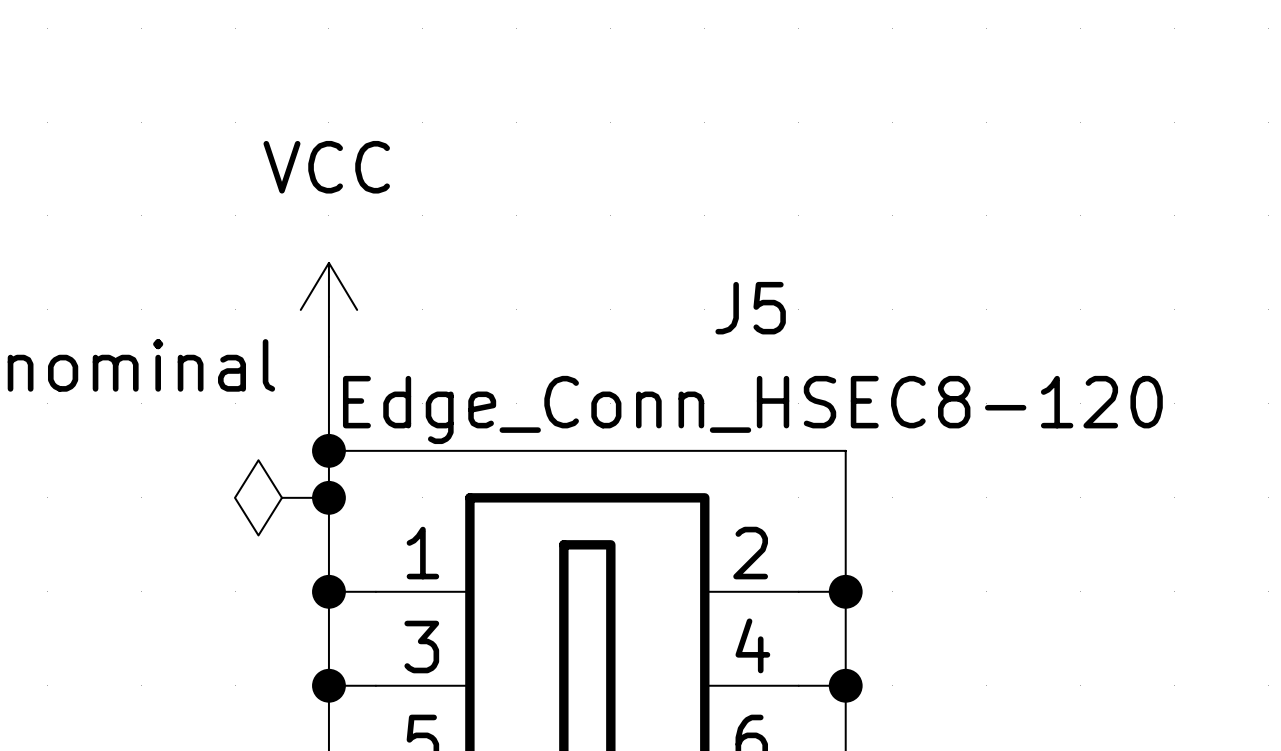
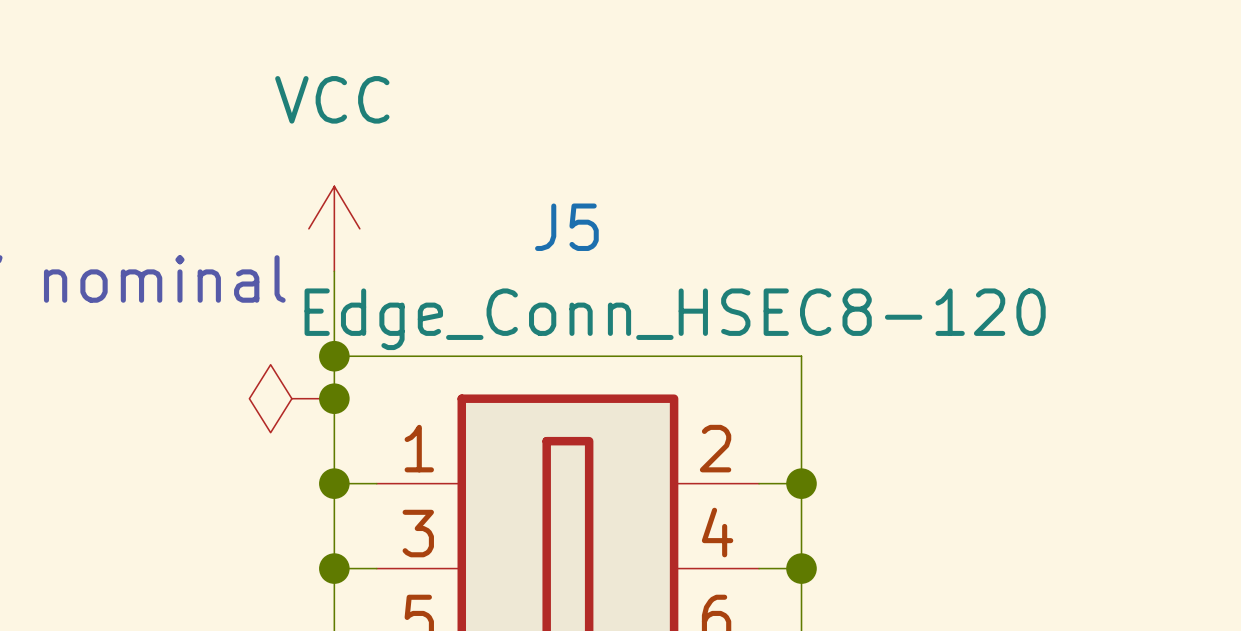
J5 name position: J5 (750, 308) -> J5 (566, 227)
J5 value position: Edge_Conn_HSEC8-120 (752, 409) -> Edge_Conn_HSEC8-120 (675, 319)

